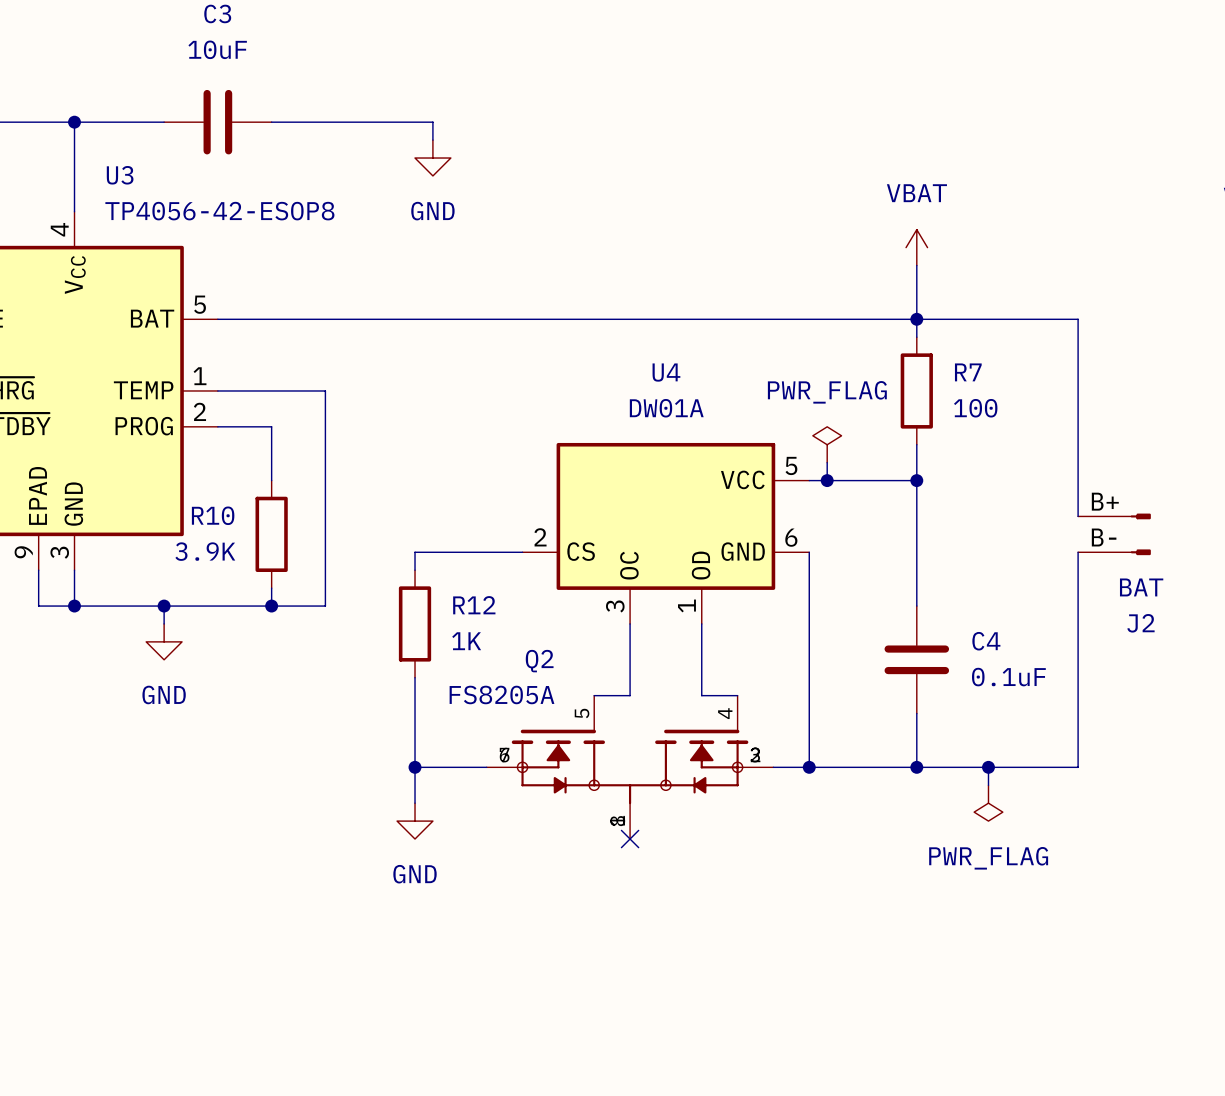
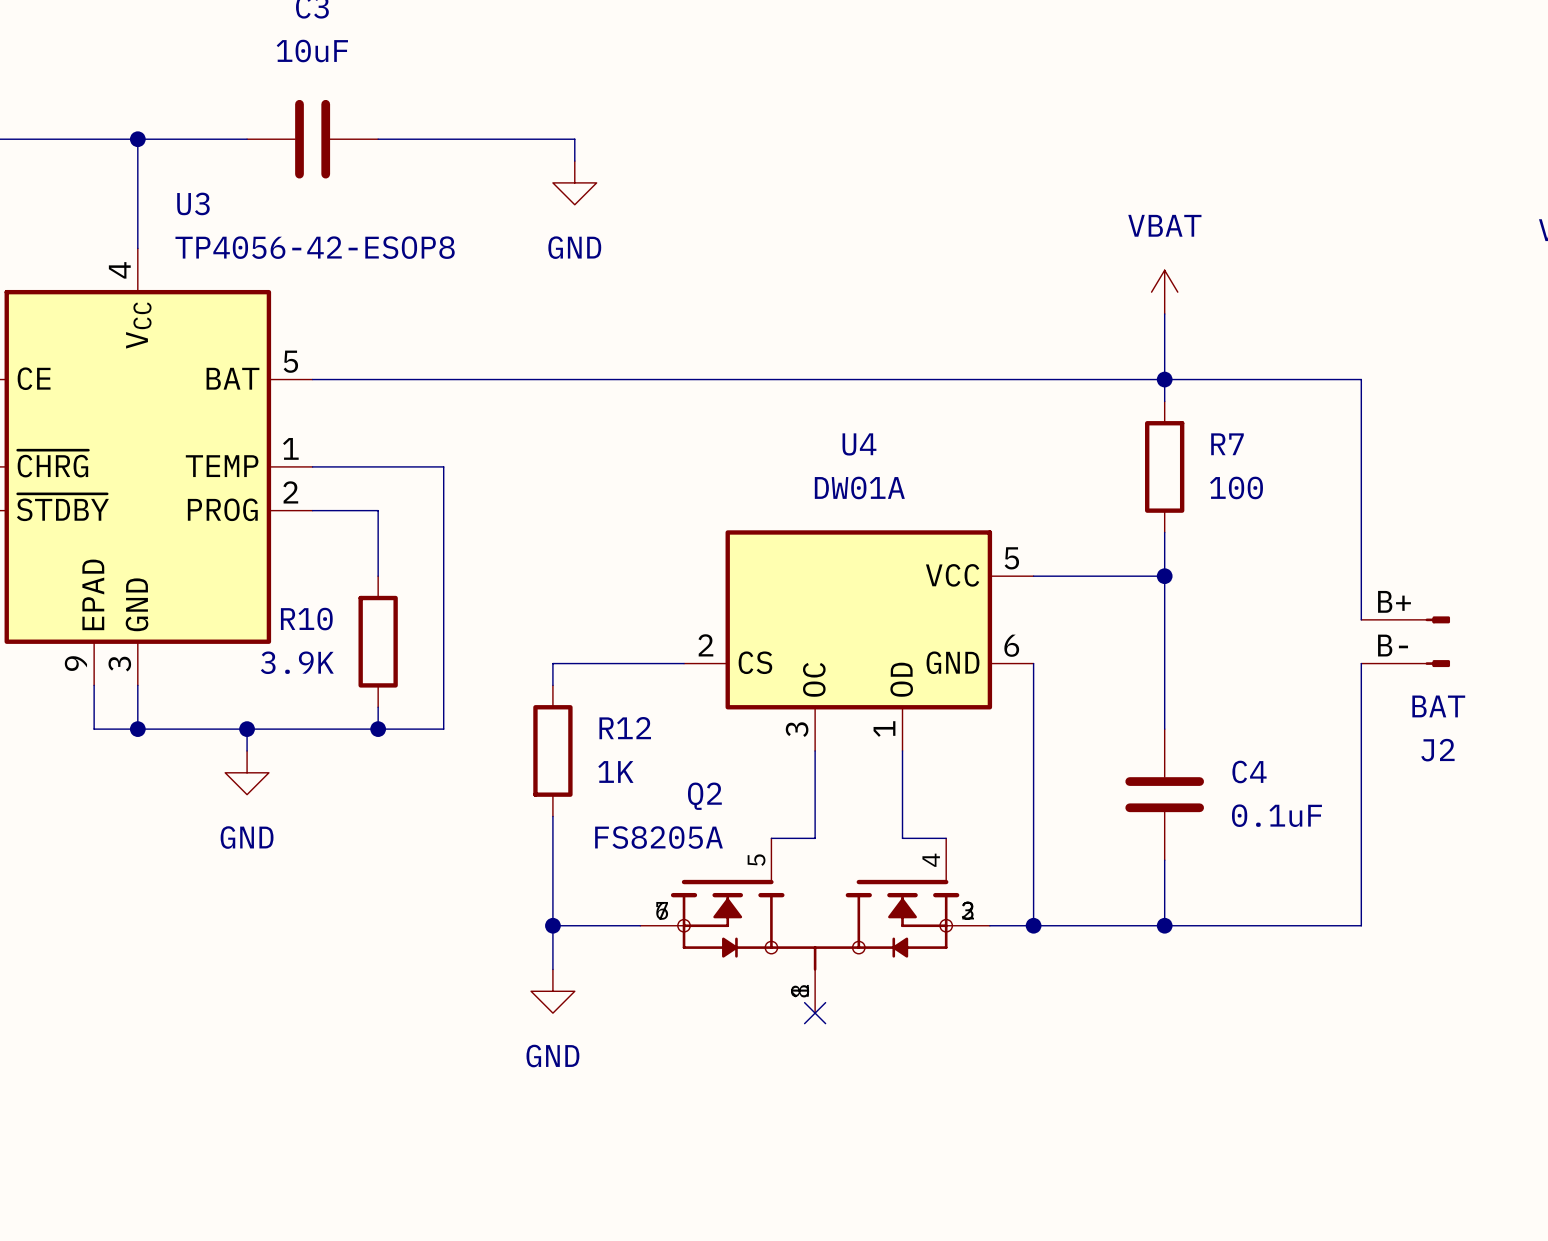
power symbol: PWR_FLAG (827, 444) -> none
wire: (827, 462) (827, 480) -> none
junction: (827, 480) -> none
wire: (988, 767) (988, 785) -> none
junction: (988, 767) -> none
power symbol: PWR_FLAG (988, 803) -> none

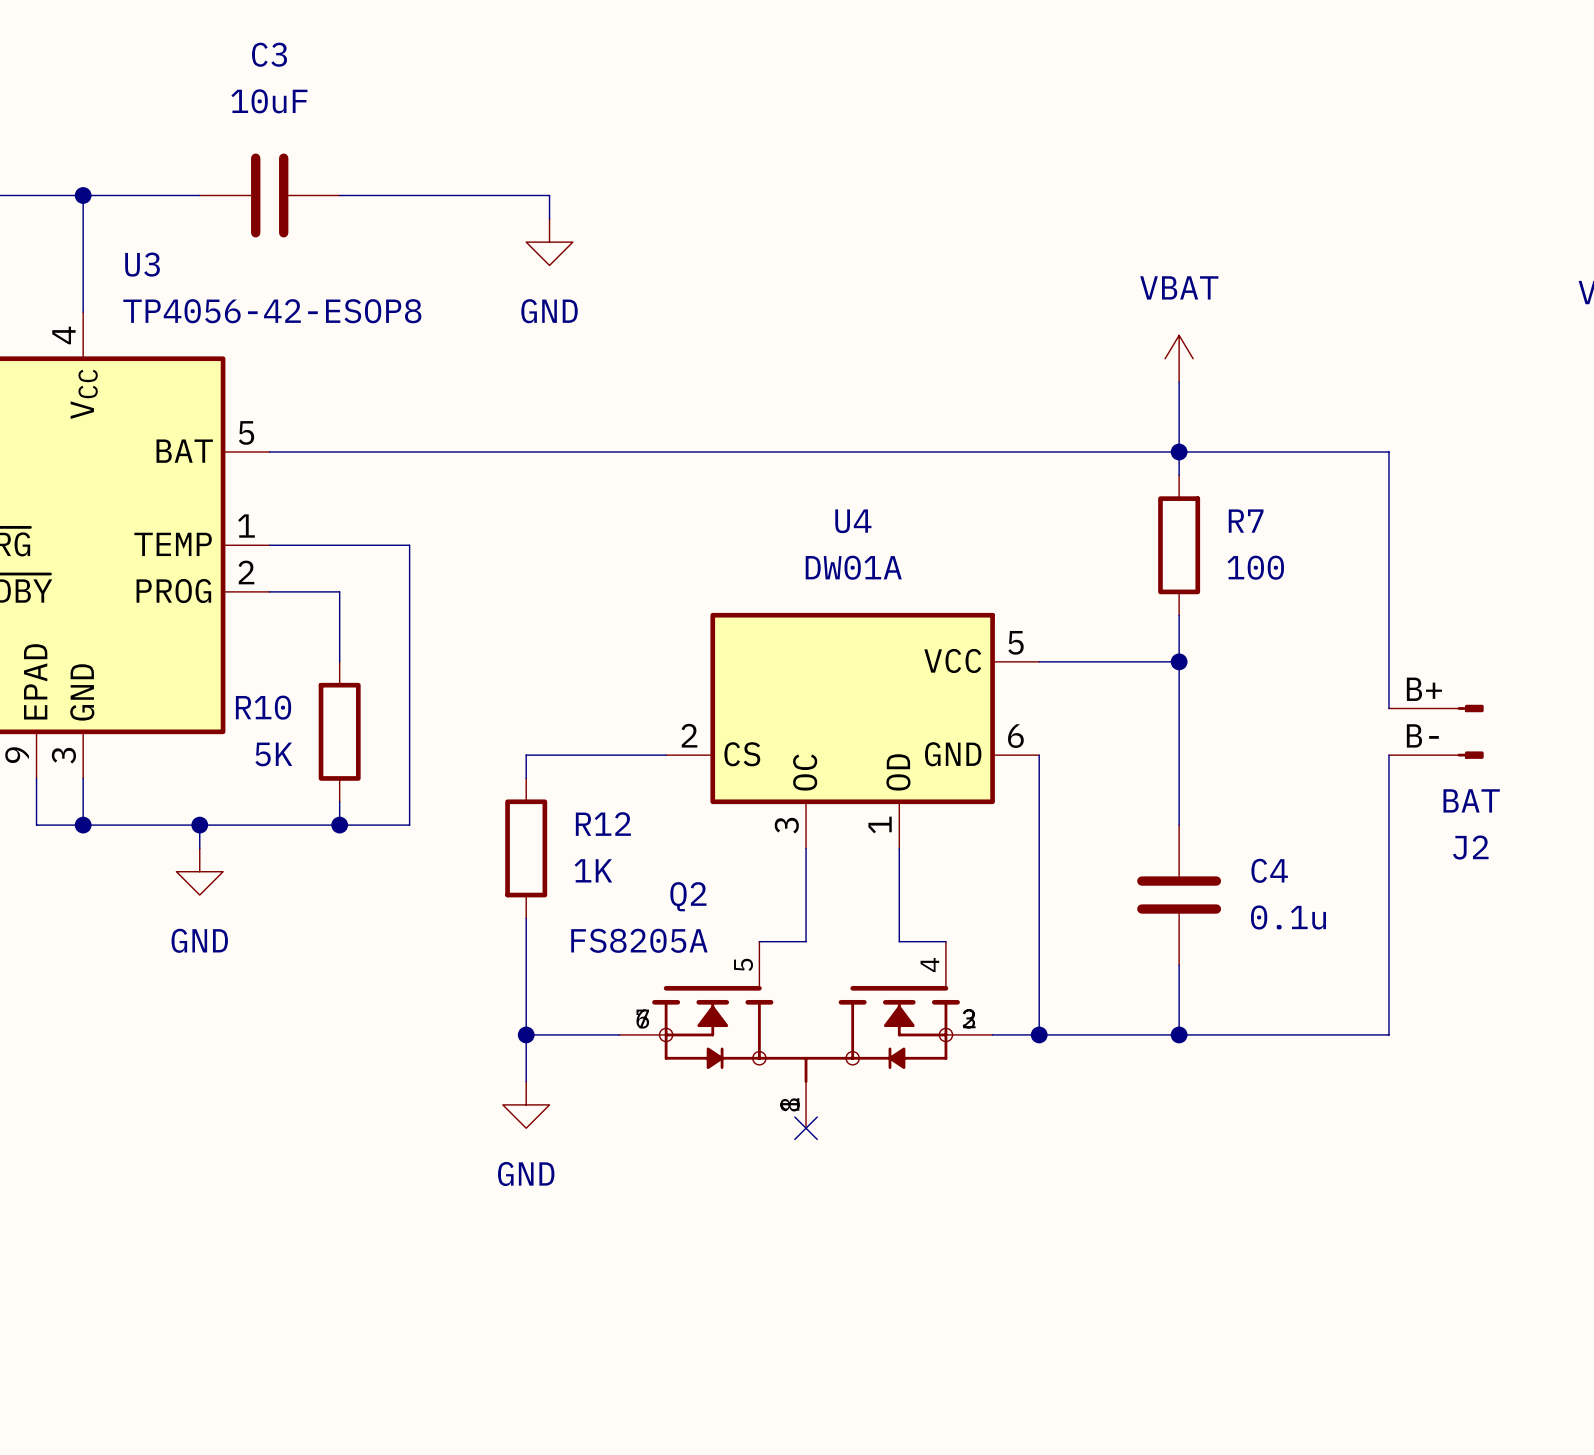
R10 value: 3.9K (297, 662) -> 5K (273, 754)
C4 value: 0.1uF (1276, 815) -> 0.1u (1288, 917)

